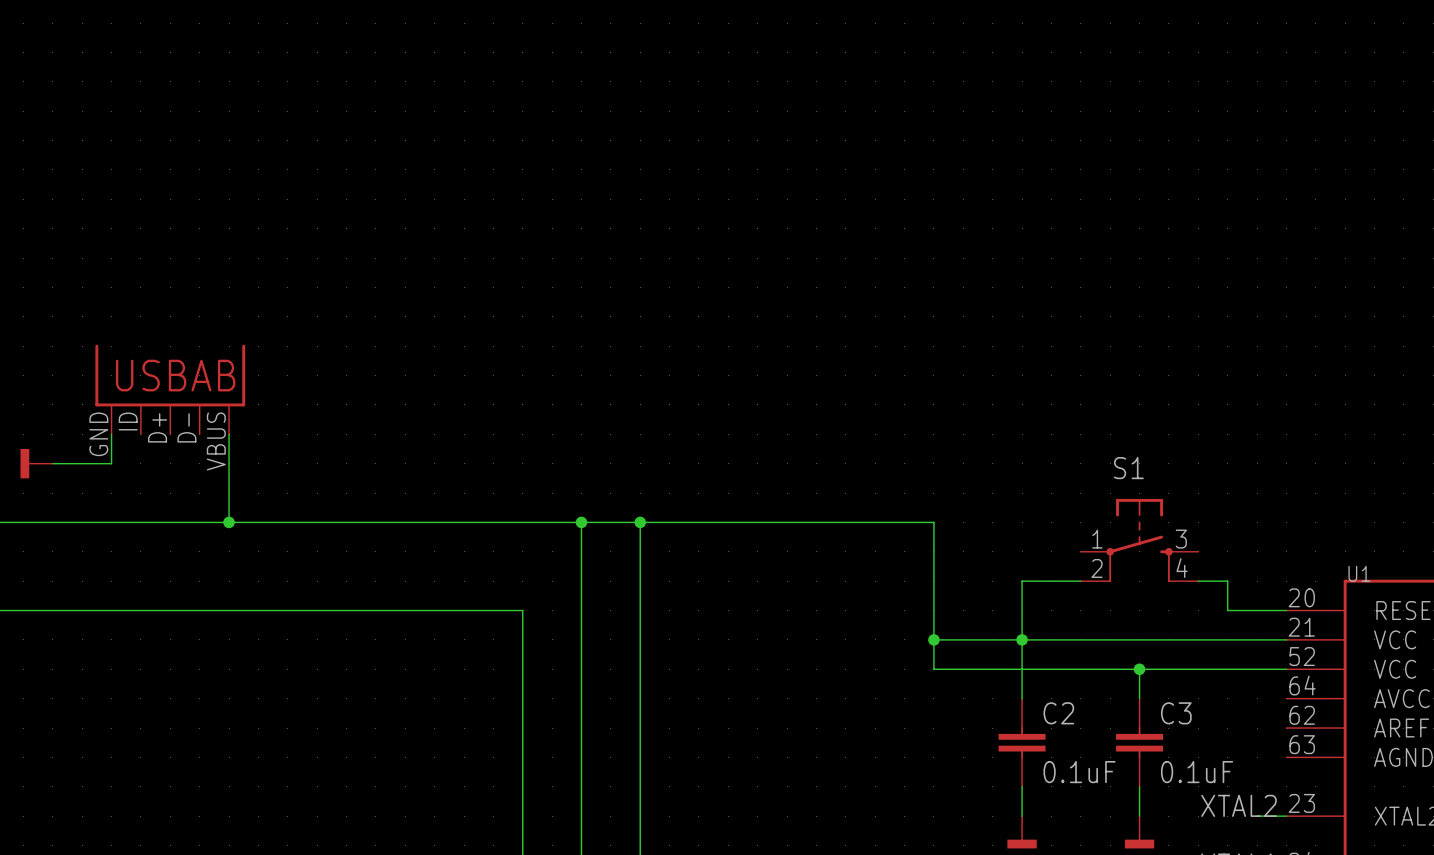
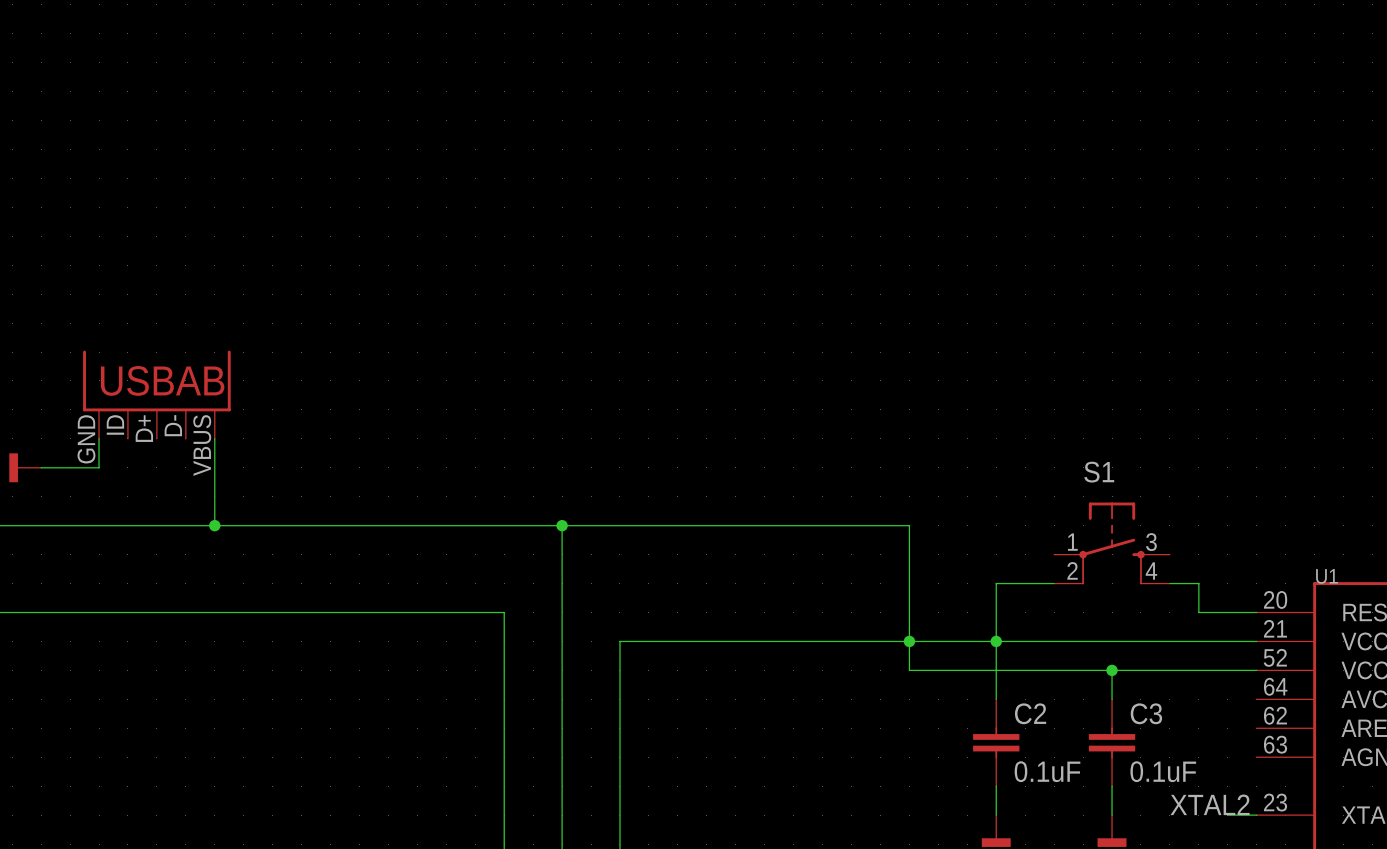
wire: (640, 522) (640, 639) -> (909, 641) (619, 641)
junction: (640, 522) -> none

